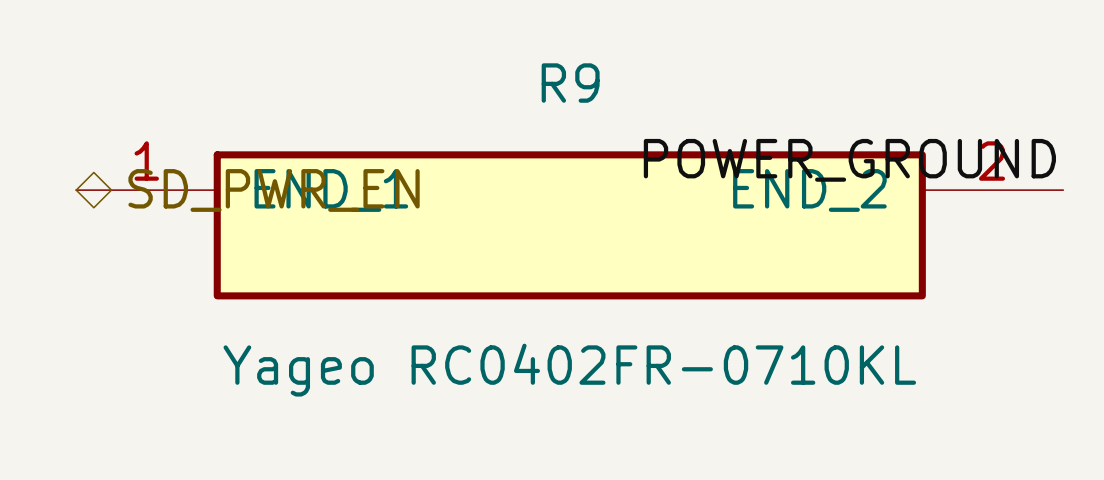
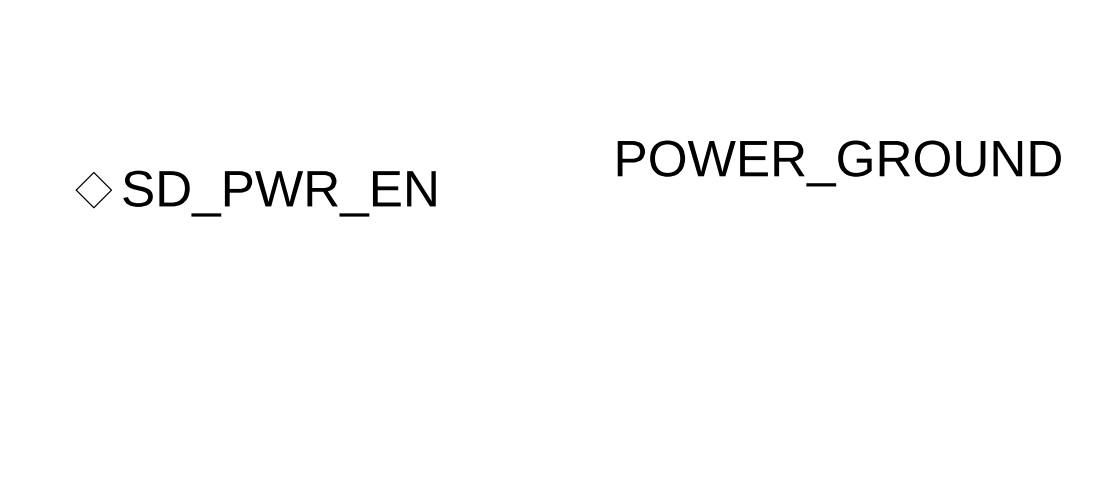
R9: Yageo RC0402FR-0710KL (569, 225) -> none

